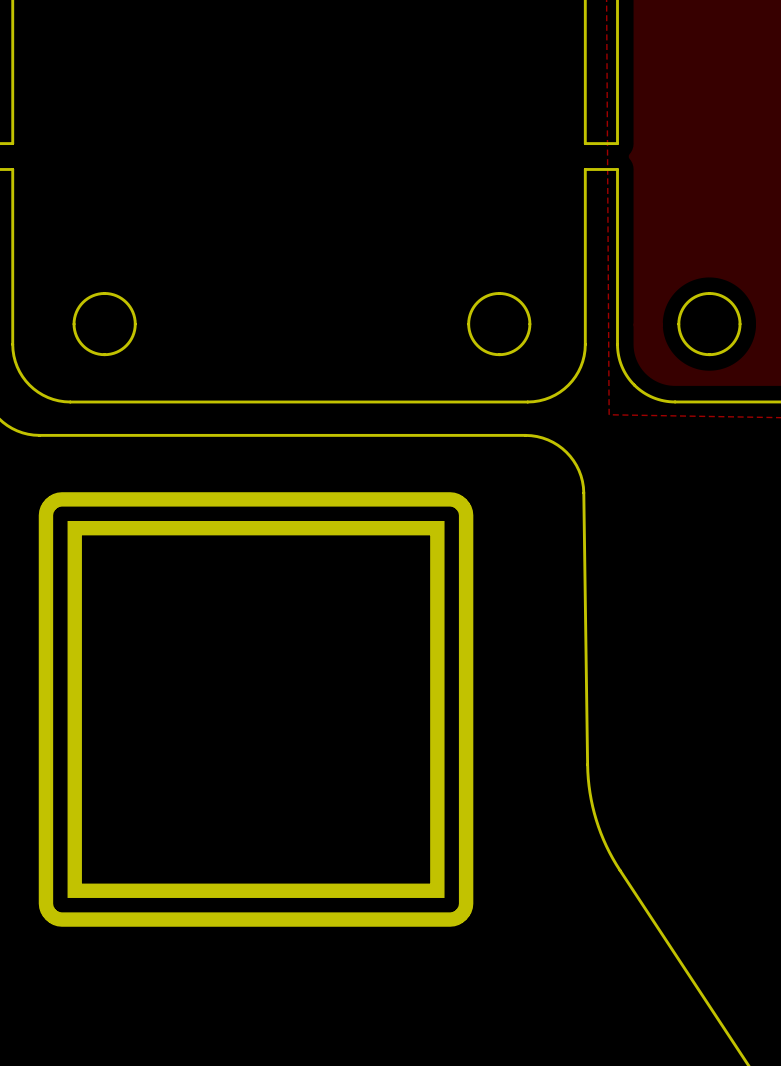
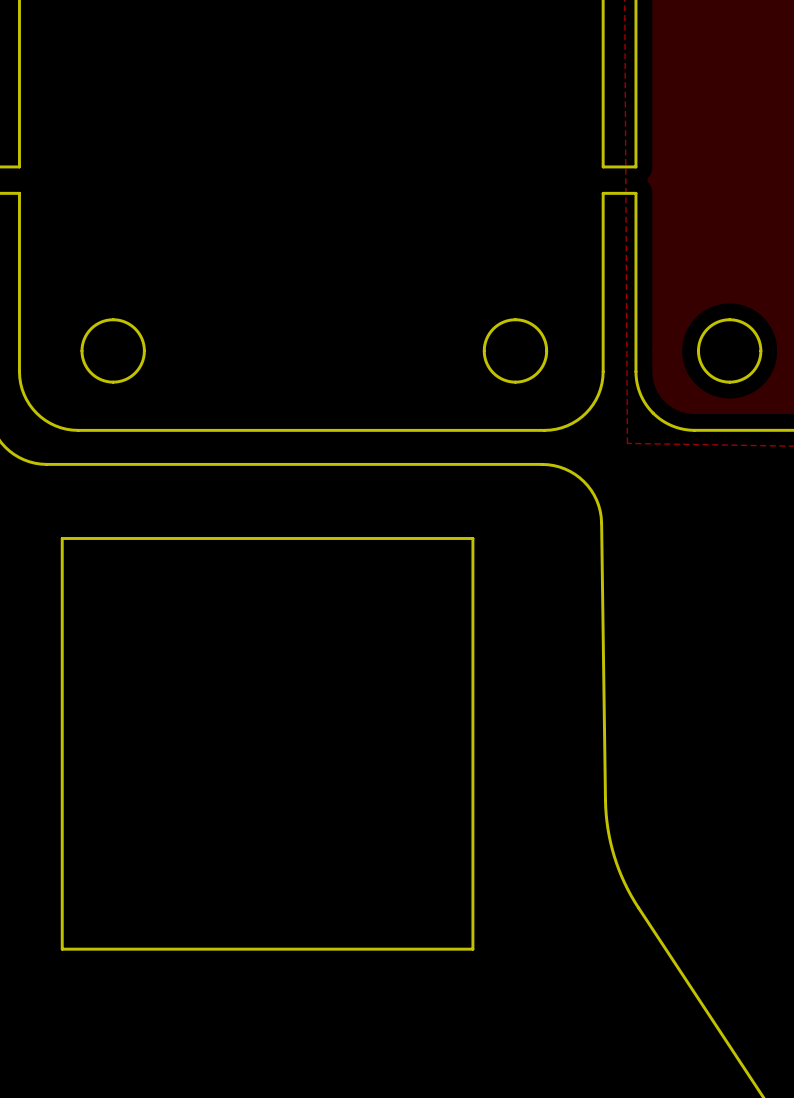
board edge: none -> (62, 538) (472, 538) (472, 949) (62, 949) (62, 538)
part: (256, 709) -> none

